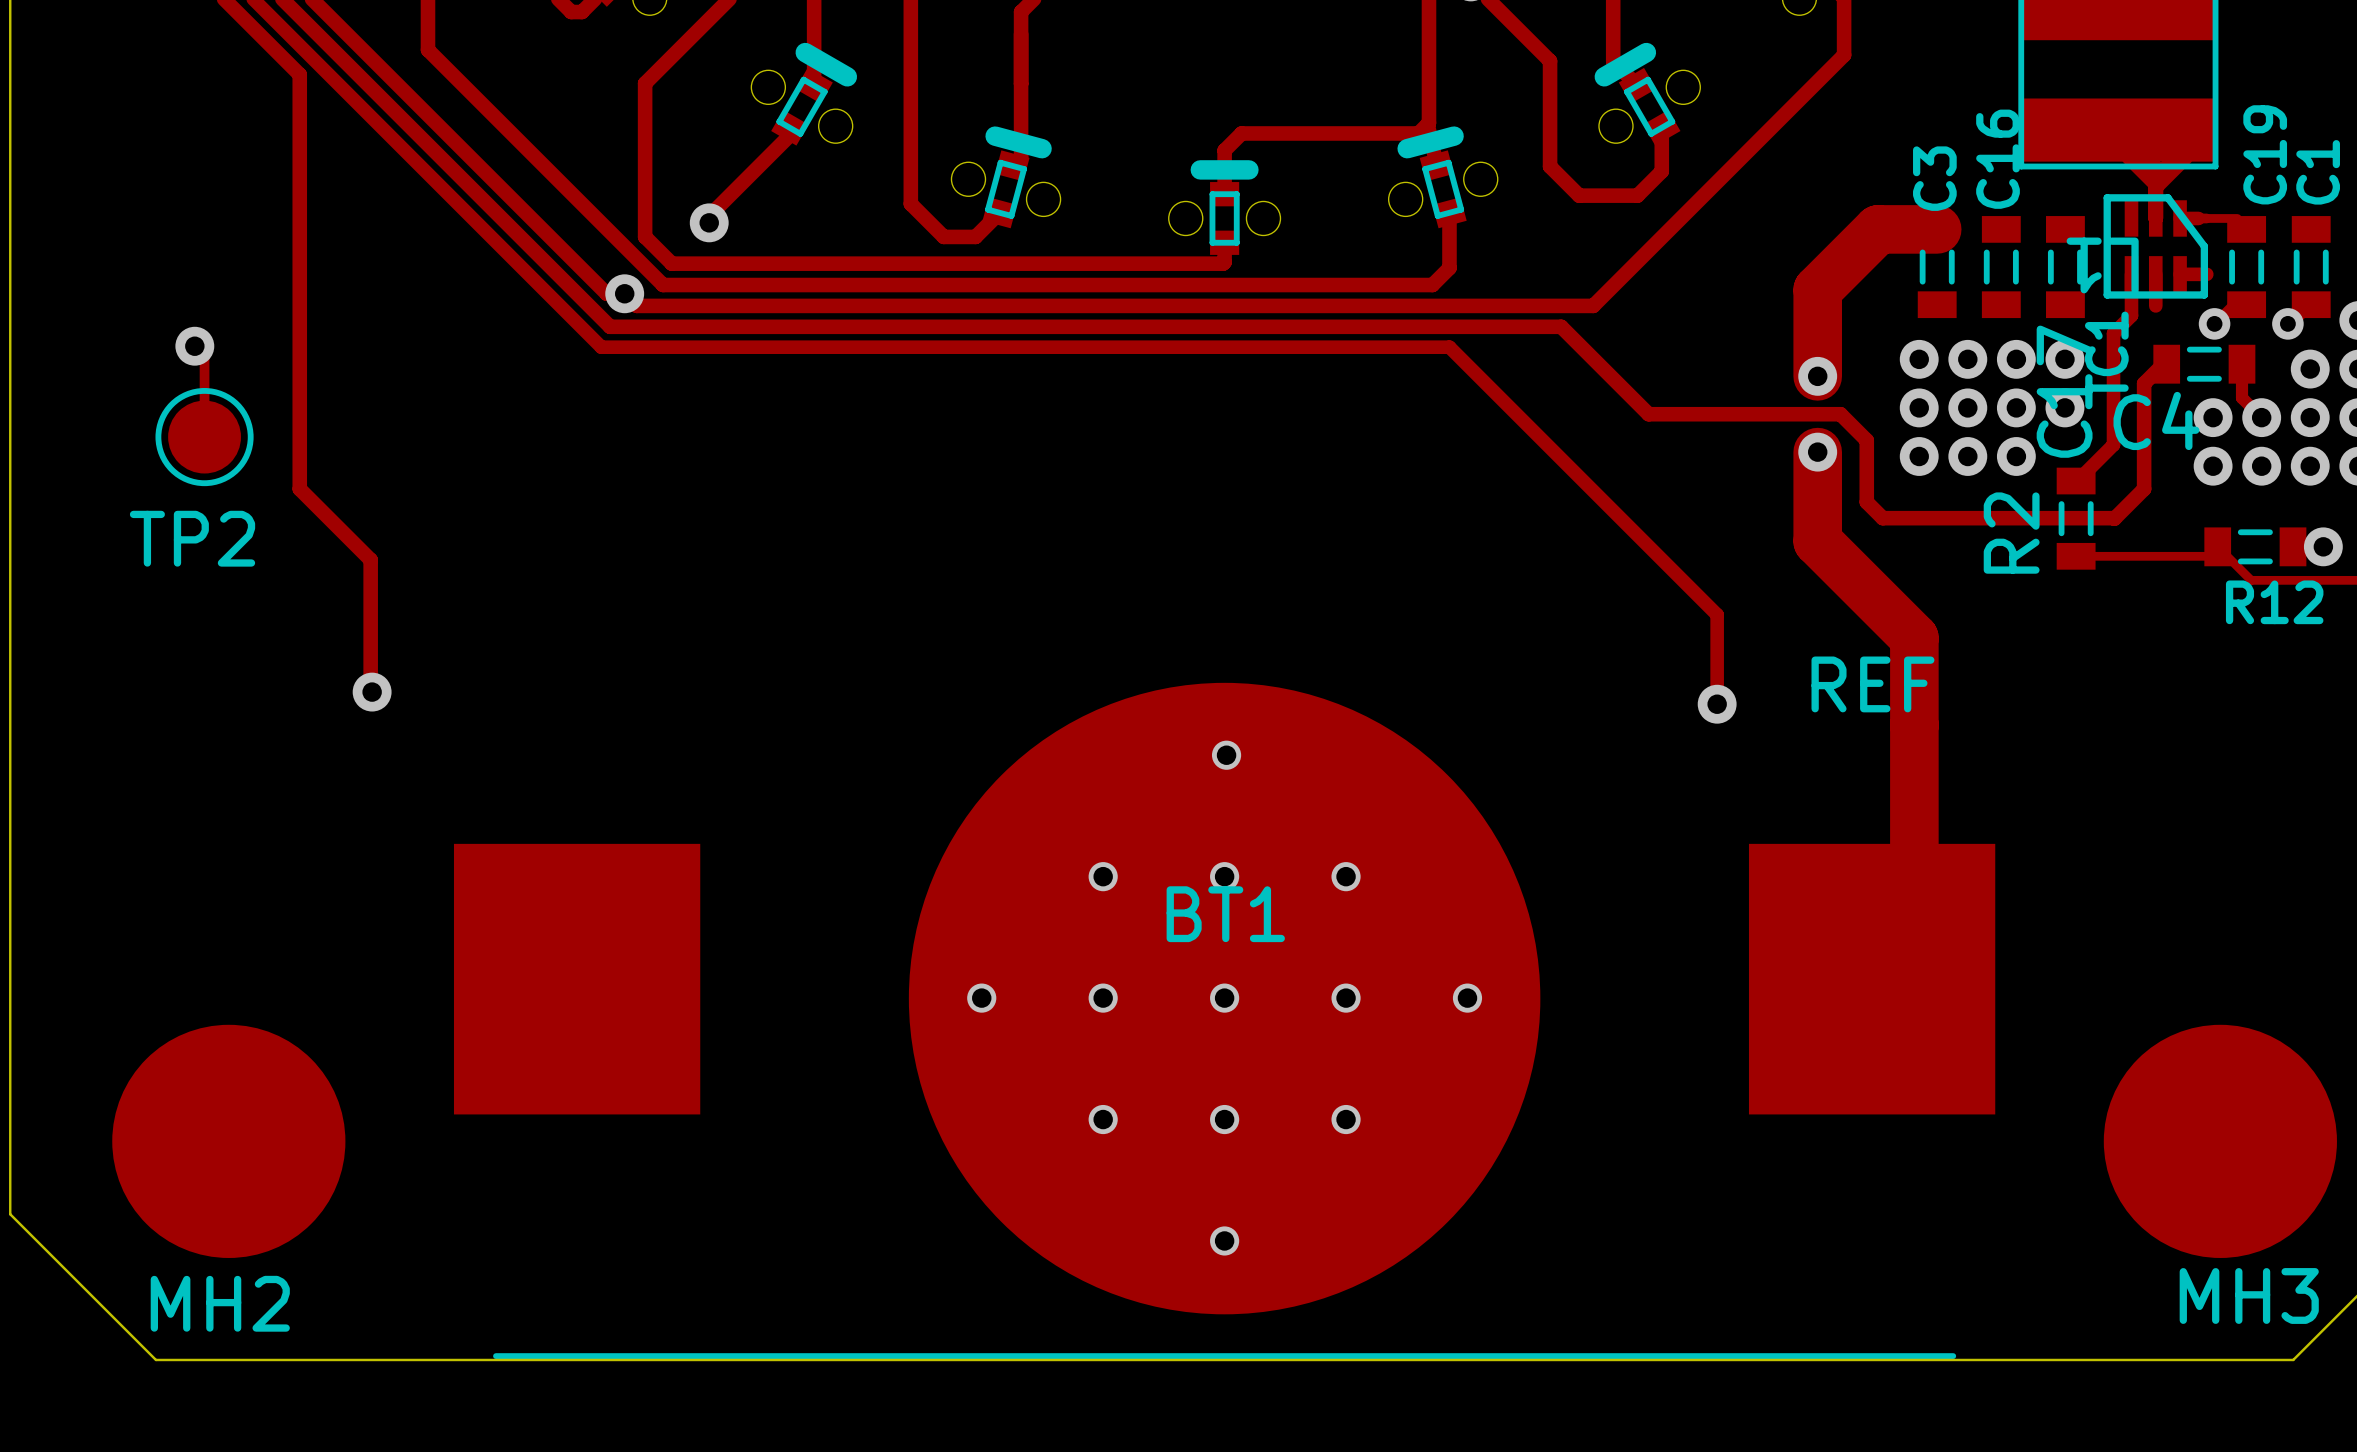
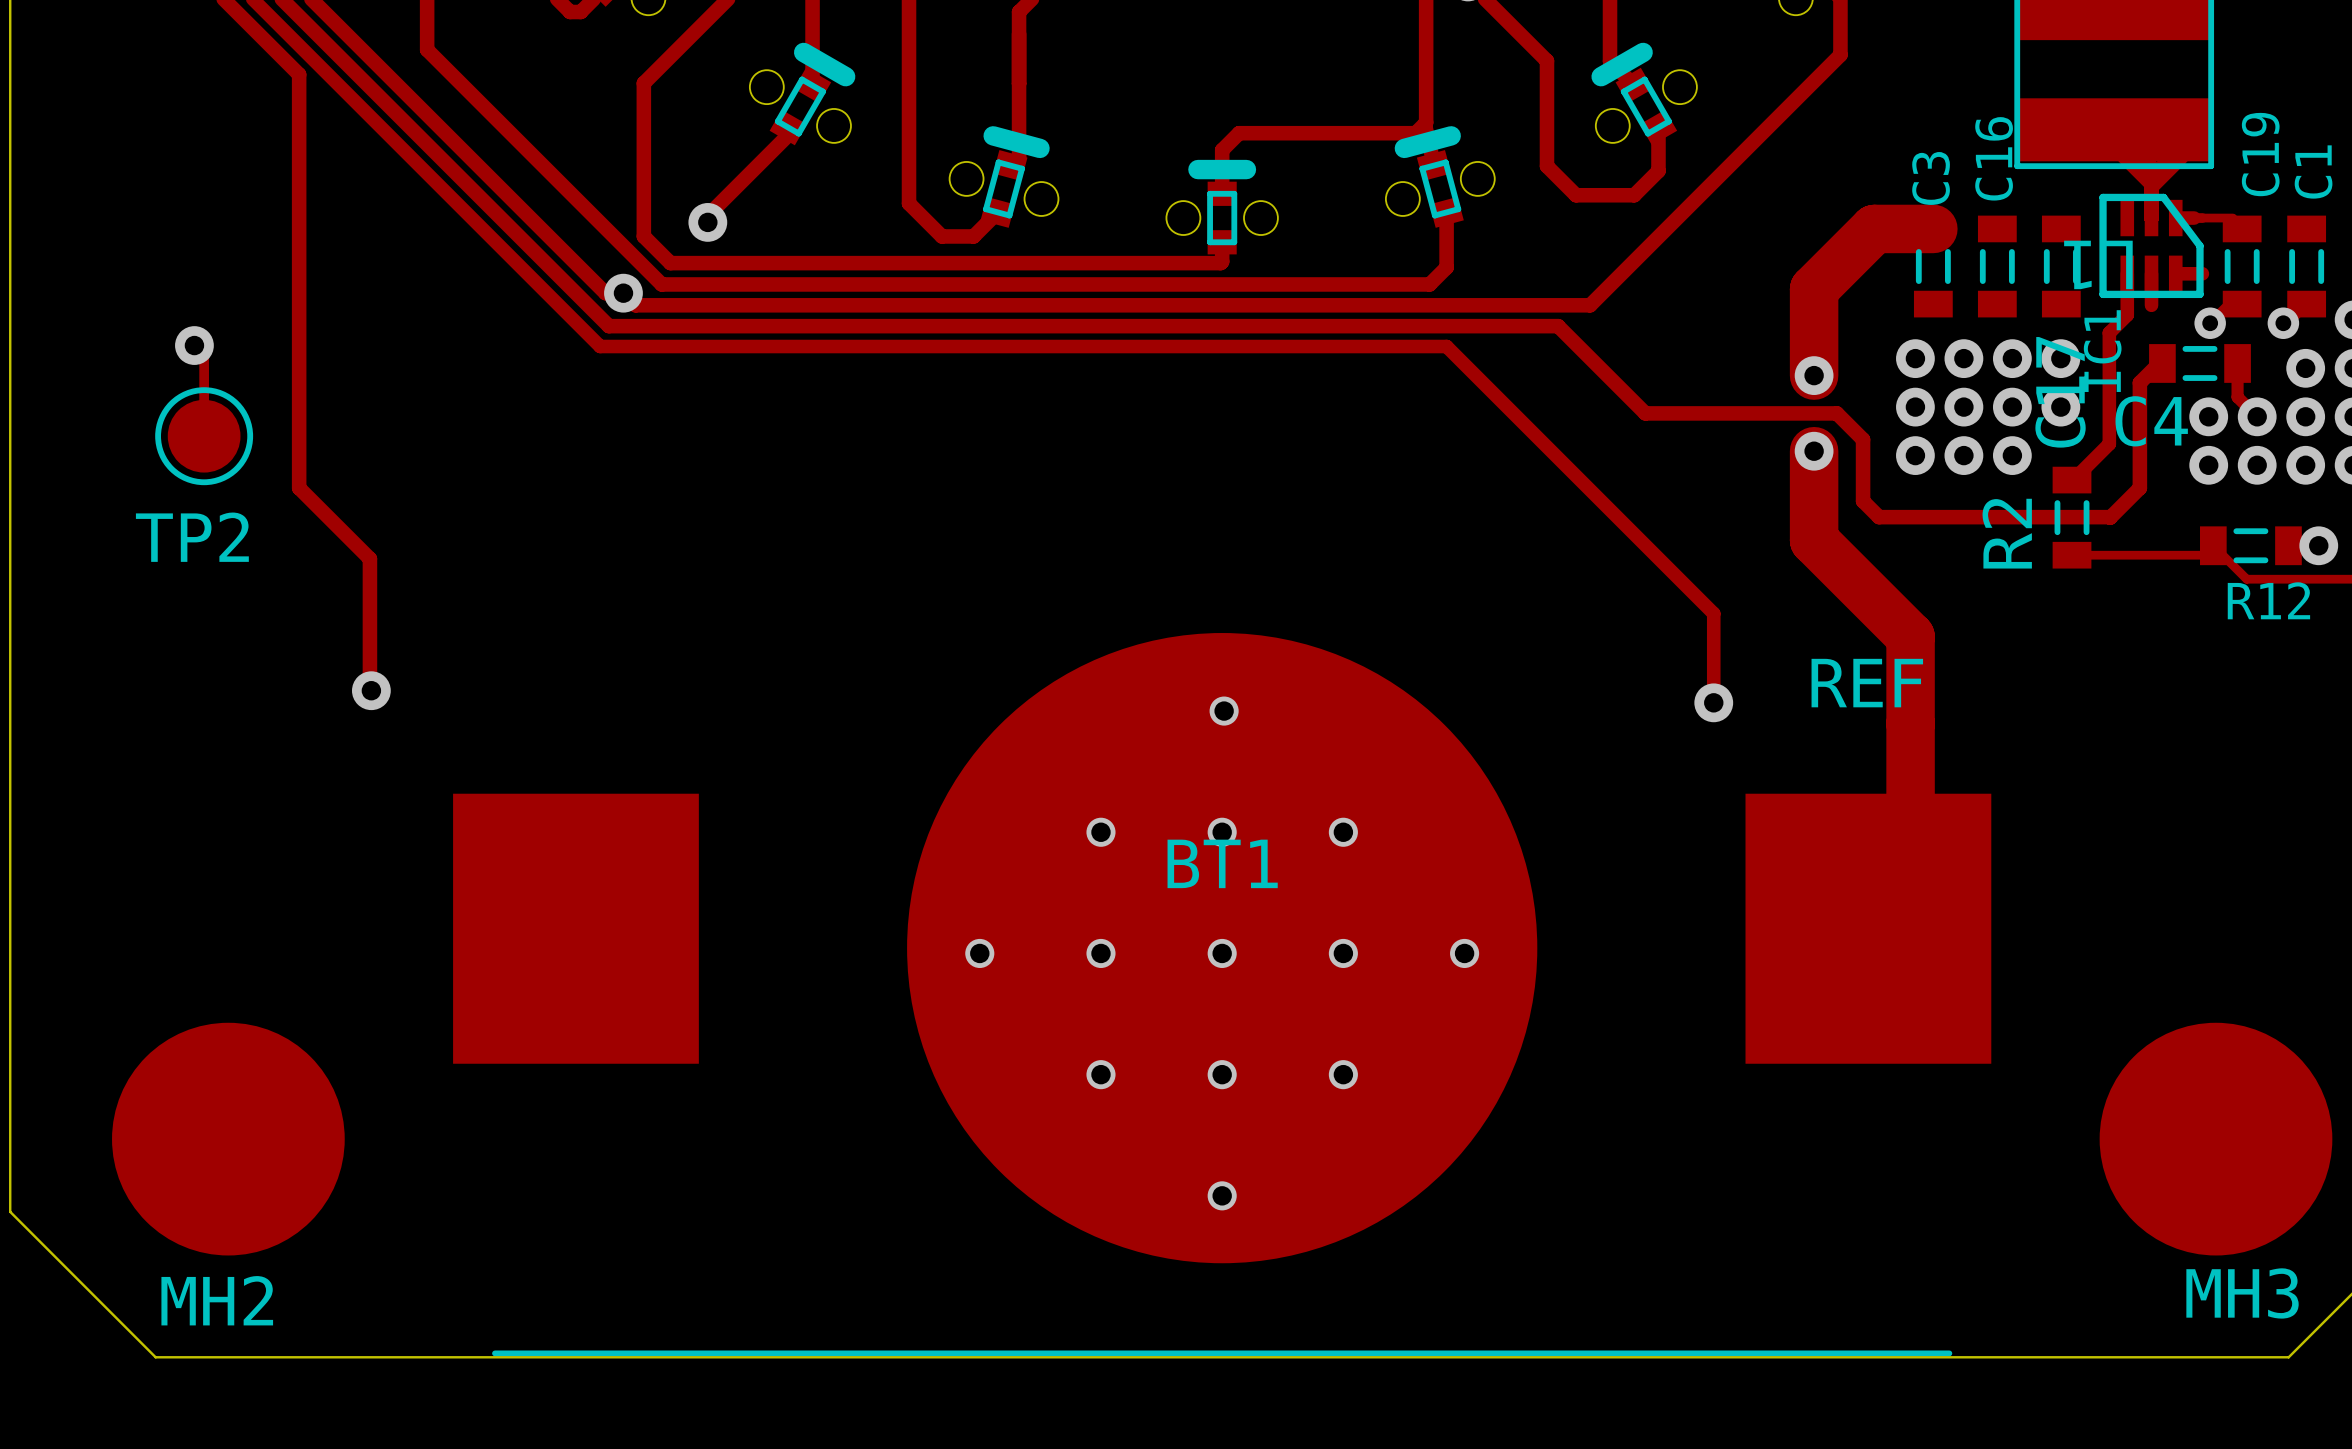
BT1 footprint: [453, 682, 1996, 1360] -> [453, 633, 1992, 1357]
via: none -> (1224, 711)
via: (1226, 755) -> none
via: none -> (1100, 832)
via: none -> (1222, 832)
via: none -> (1343, 832)
via: (1103, 876) -> none
via: (1224, 876) -> none
via: (1346, 876) -> none
BT1 name position: BT1 (1225, 914) -> BT1 (1222, 863)
via: none -> (1100, 953)
via: none -> (1222, 953)
via: none -> (1343, 953)
via position: (981, 998) -> (979, 953)
via: (1103, 998) -> none
via: (1224, 998) -> none
via: (1346, 998) -> none
via position: (1467, 998) -> (1464, 953)
via: none -> (1100, 1074)
via: none -> (1222, 1074)
via: none -> (1343, 1074)
via: (1103, 1119) -> none
via: (1224, 1119) -> none
via: (1346, 1119) -> none
via: none -> (1222, 1195)
via: (1224, 1240) -> none

